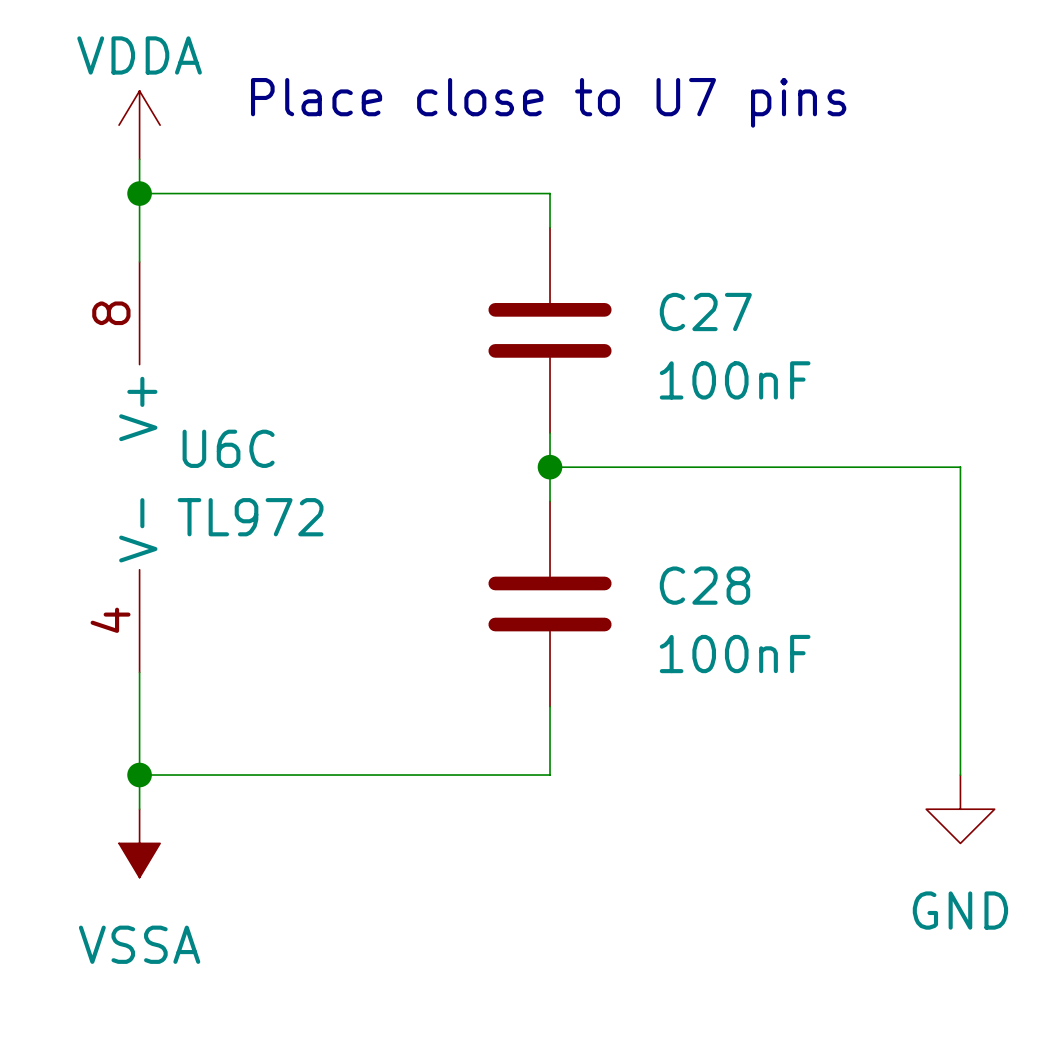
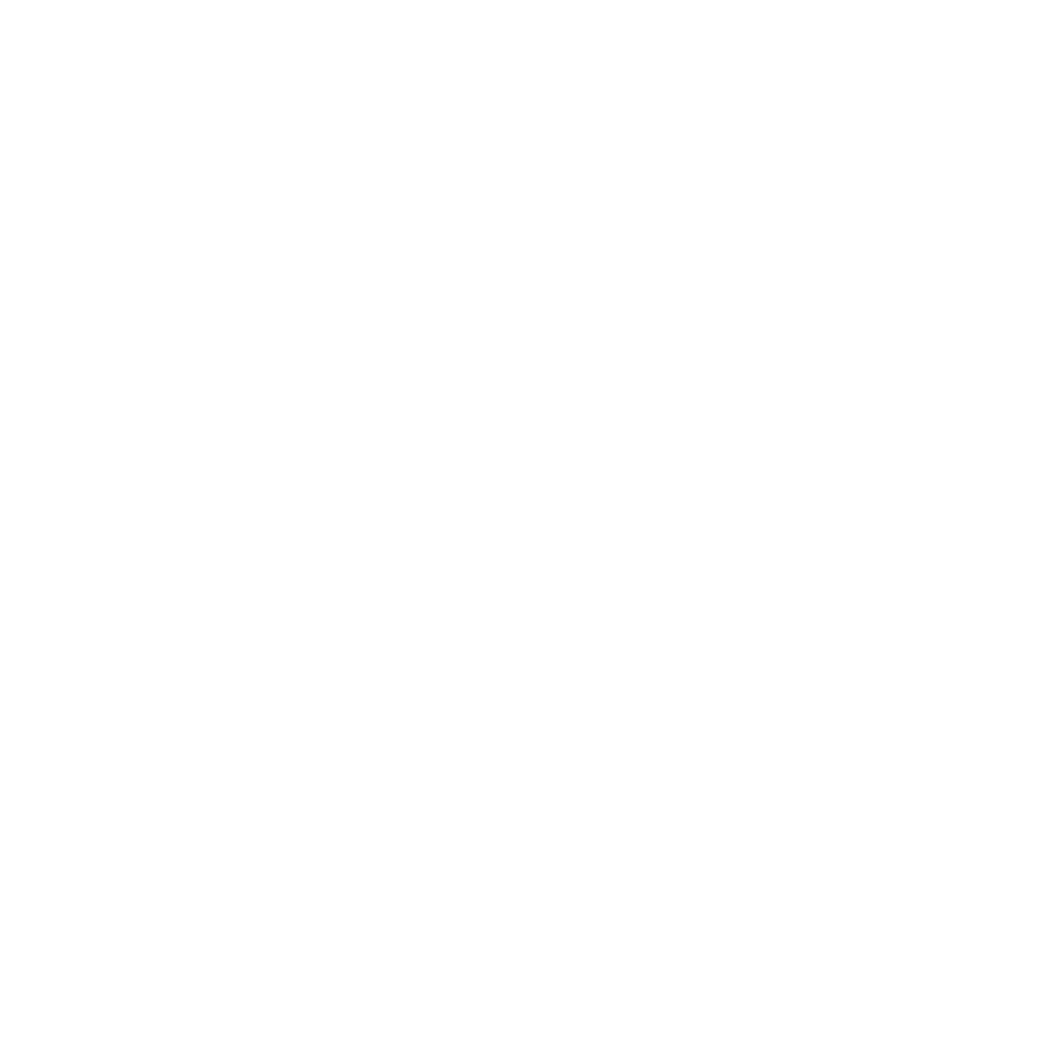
text: Place close to U7 pins (548, 102) -> none
power symbol: VDDA (139, 125) -> none
wire: (139, 159) (139, 261) -> none
wire: (139, 193) (550, 193) (550, 227) -> none
junction: (139, 193) -> none
C27: 100nF (550, 330) -> none
wire: (550, 432) (550, 501) -> none
U6C: TL972 (139, 467) -> none
wire: (550, 467) (960, 467) (960, 775) -> none
junction: (550, 467) -> none
C28: 100nF (550, 603) -> none
wire: (139, 672) (139, 809) -> none
wire: (550, 706) (550, 775) (139, 775) -> none
junction: (139, 775) -> none
power symbol: GND (960, 809) -> none
power symbol: VSSA (139, 843) -> none

